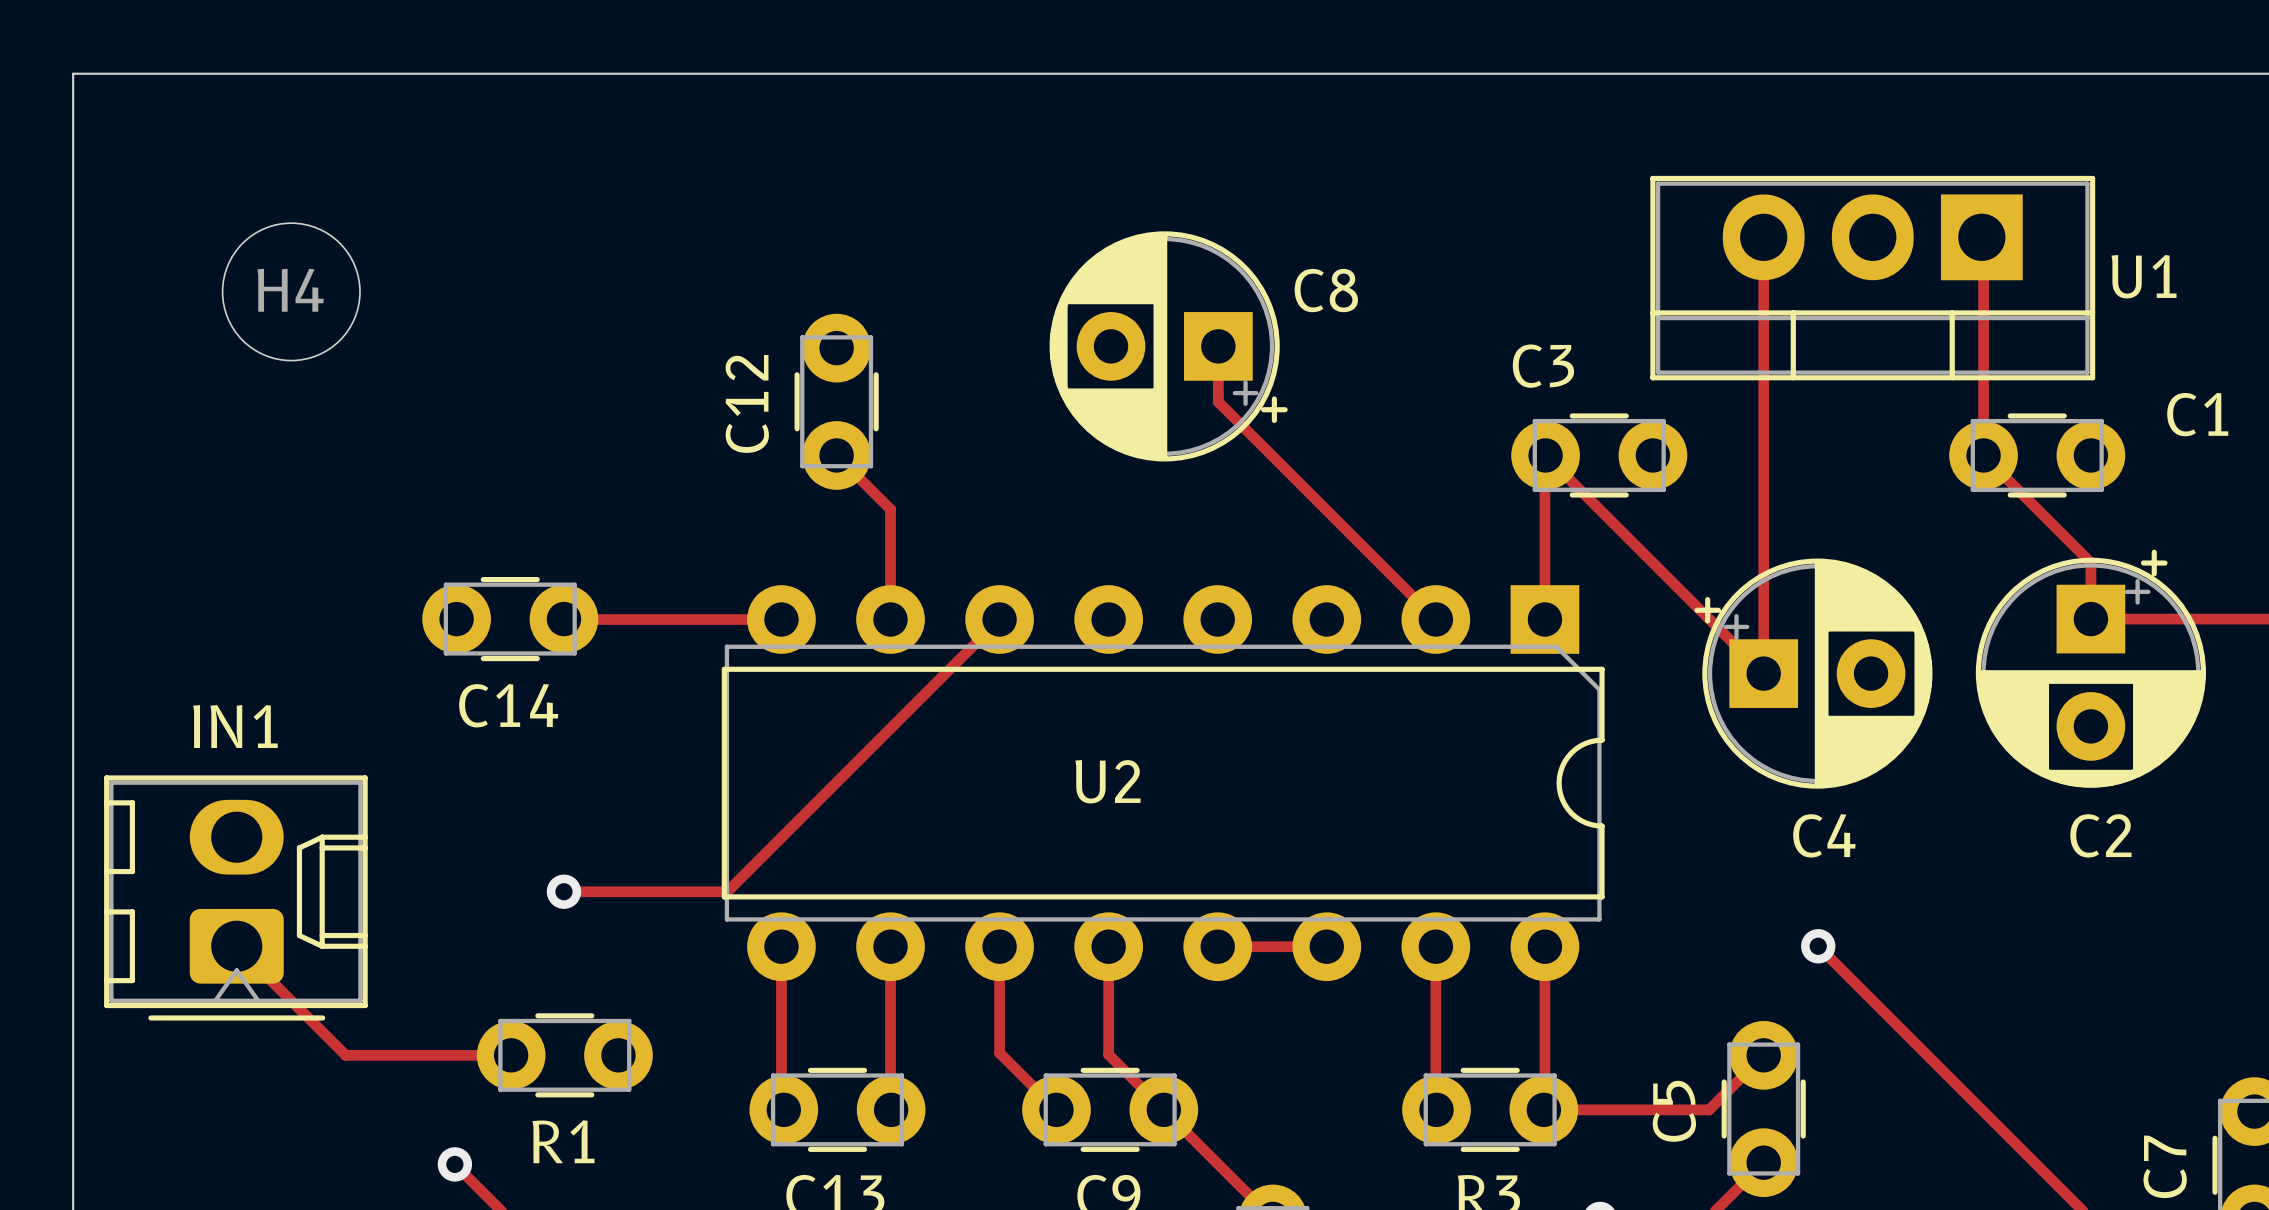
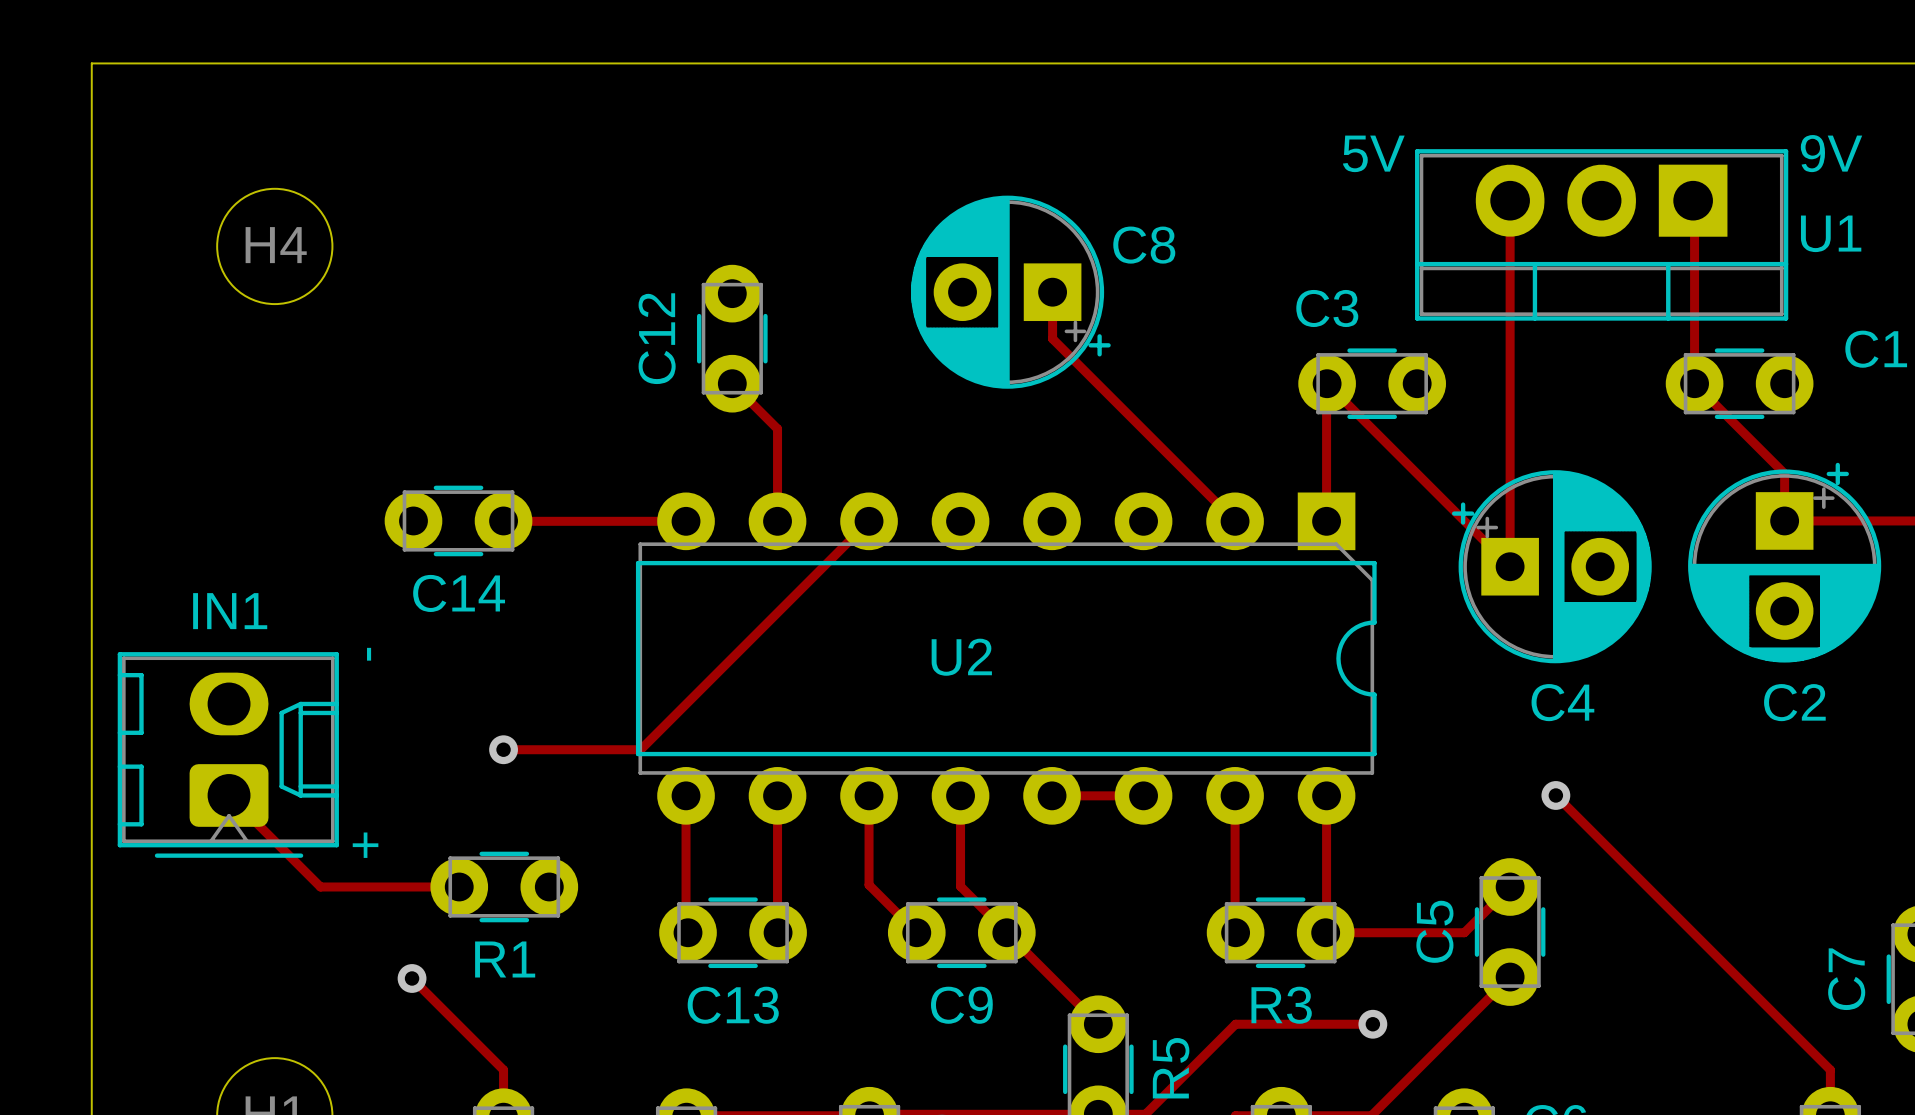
text: none -> 5V (1373, 153)
text: none -> 9V (1831, 153)
text: none -> - (369, 654)
text: none -> + (365, 845)

